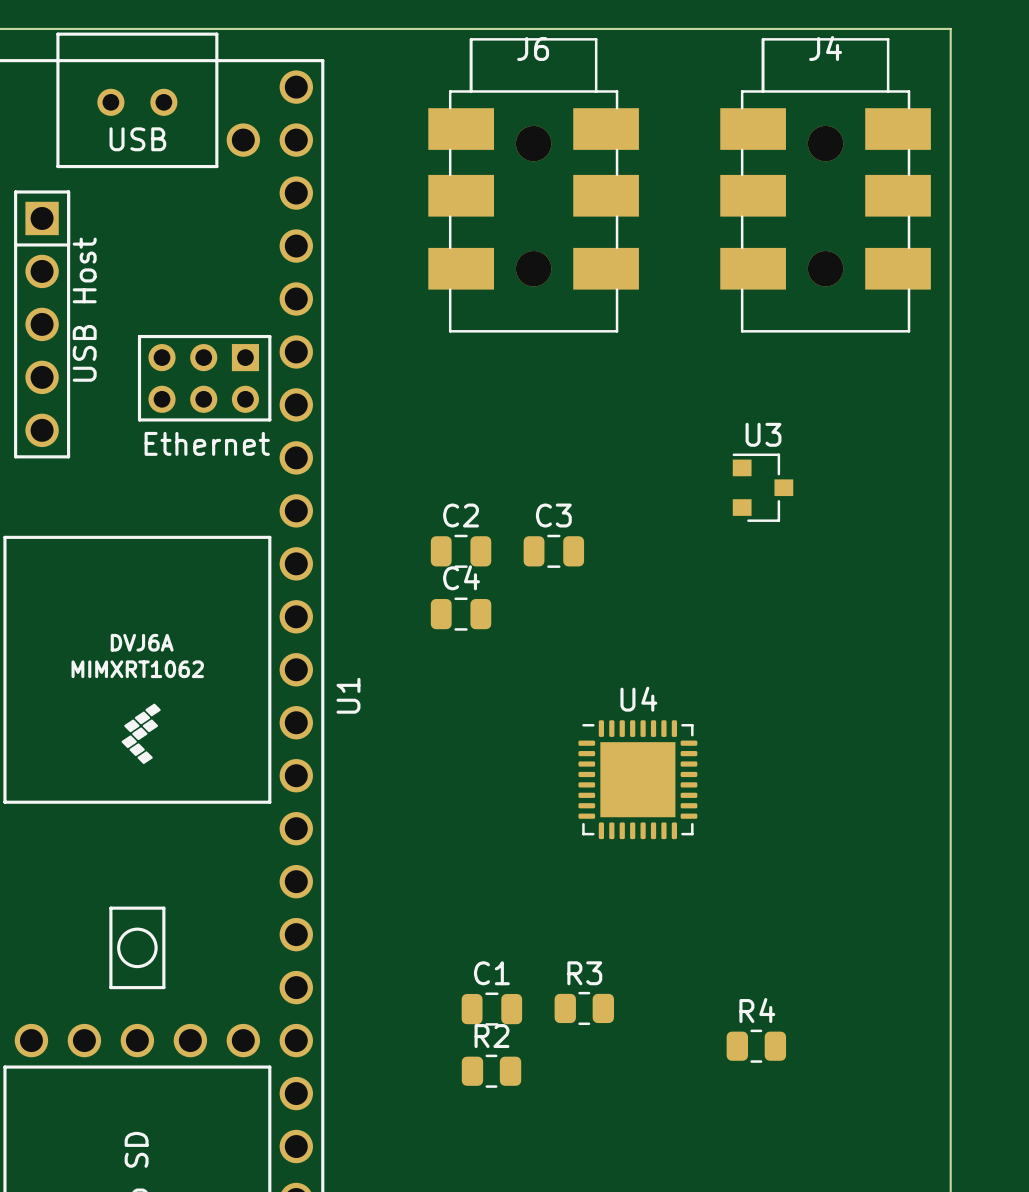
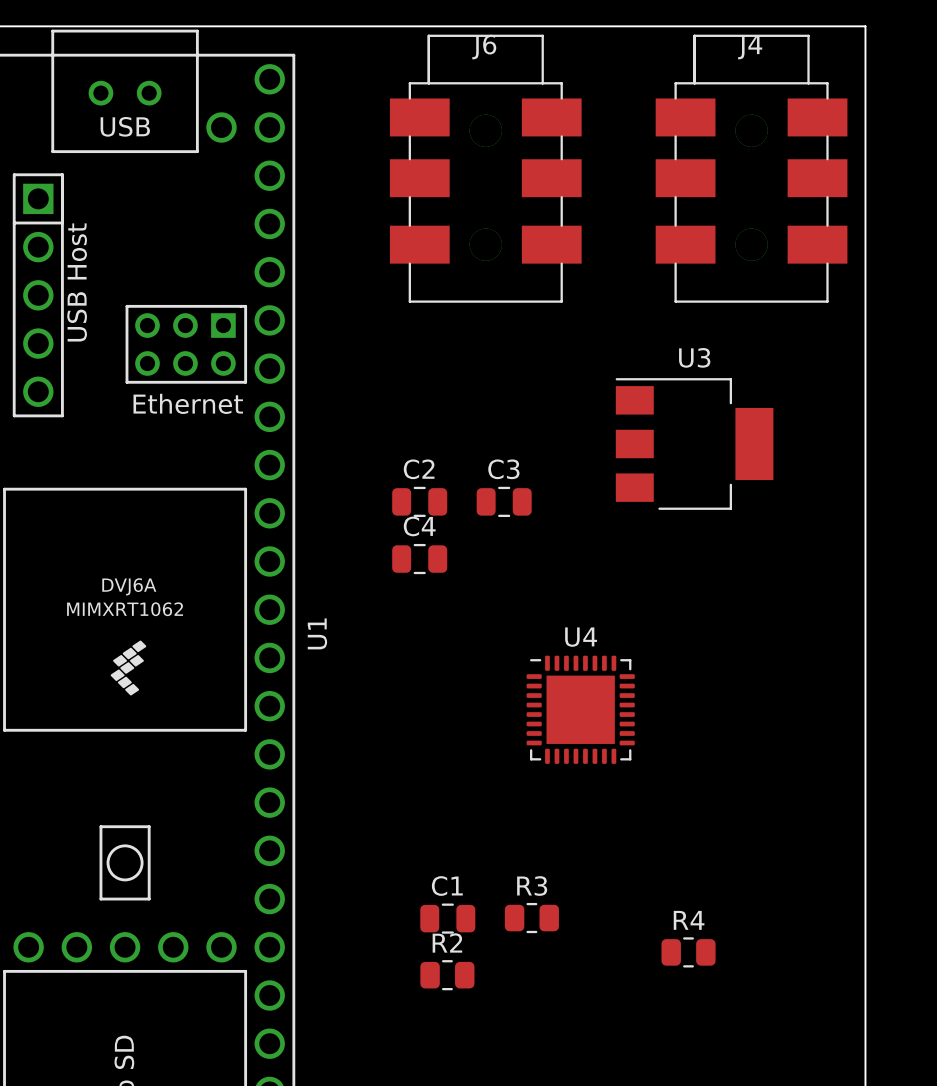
U3 footprint: [732, 453, 794, 522] -> [615, 378, 774, 510]

